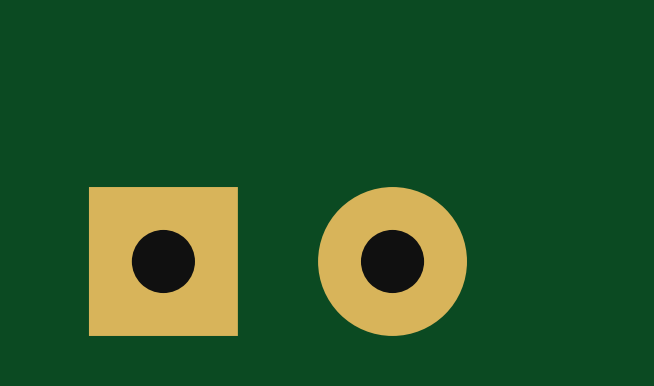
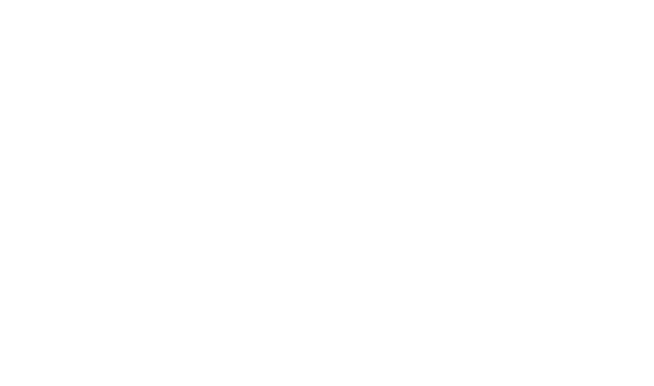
part: (277, 261) -> none

